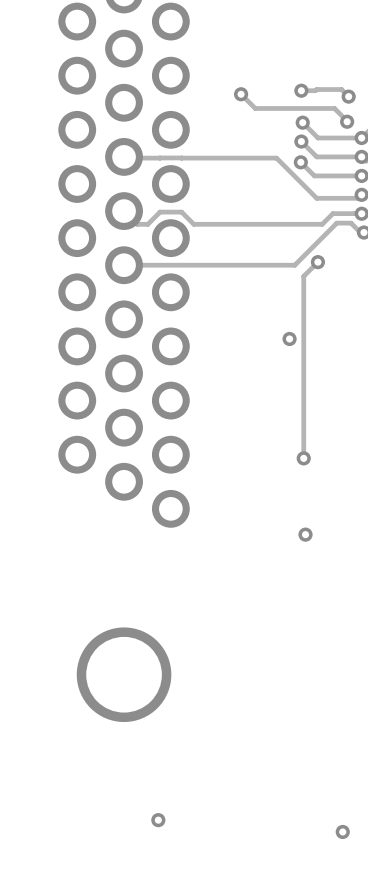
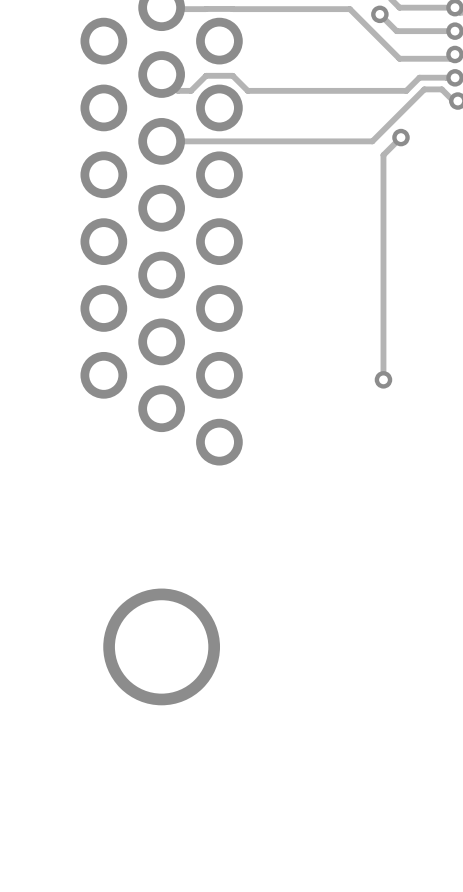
via: (289, 338) -> none
via: (305, 534) -> none
via: (158, 820) -> none
via: (342, 831) -> none

